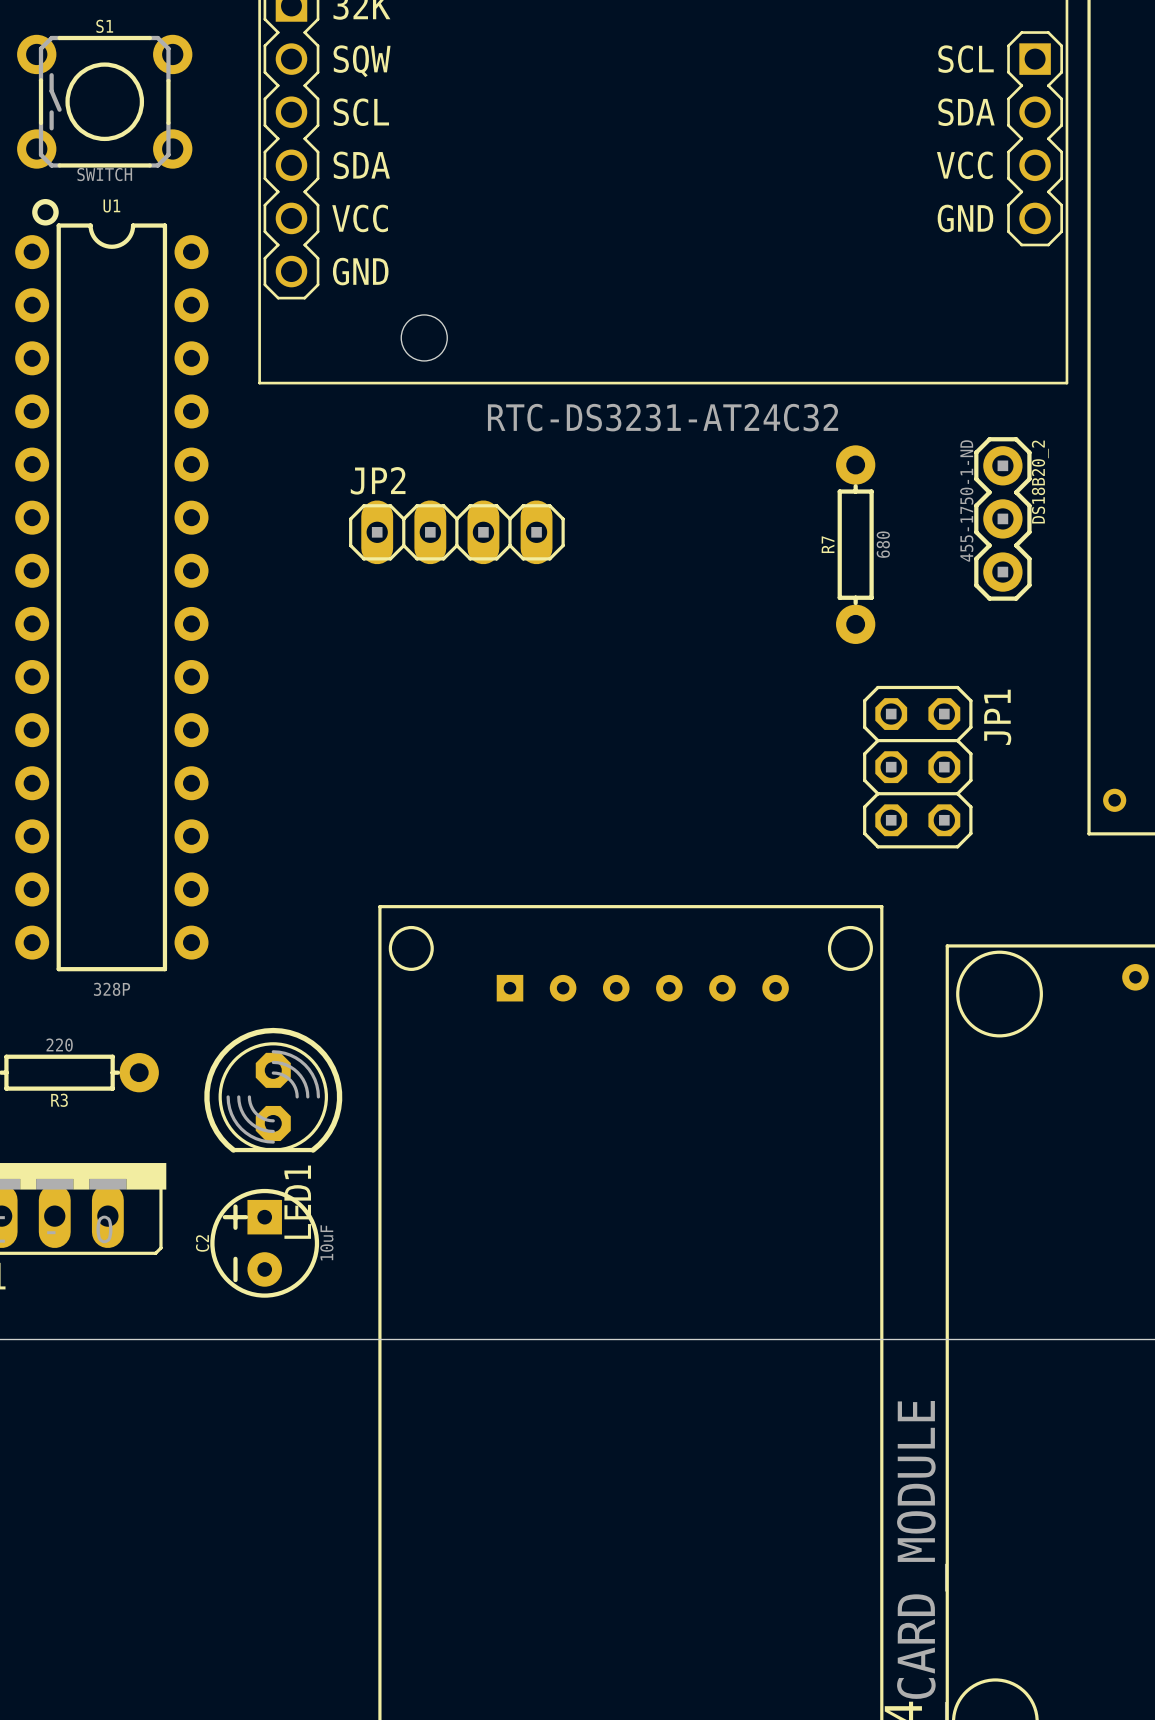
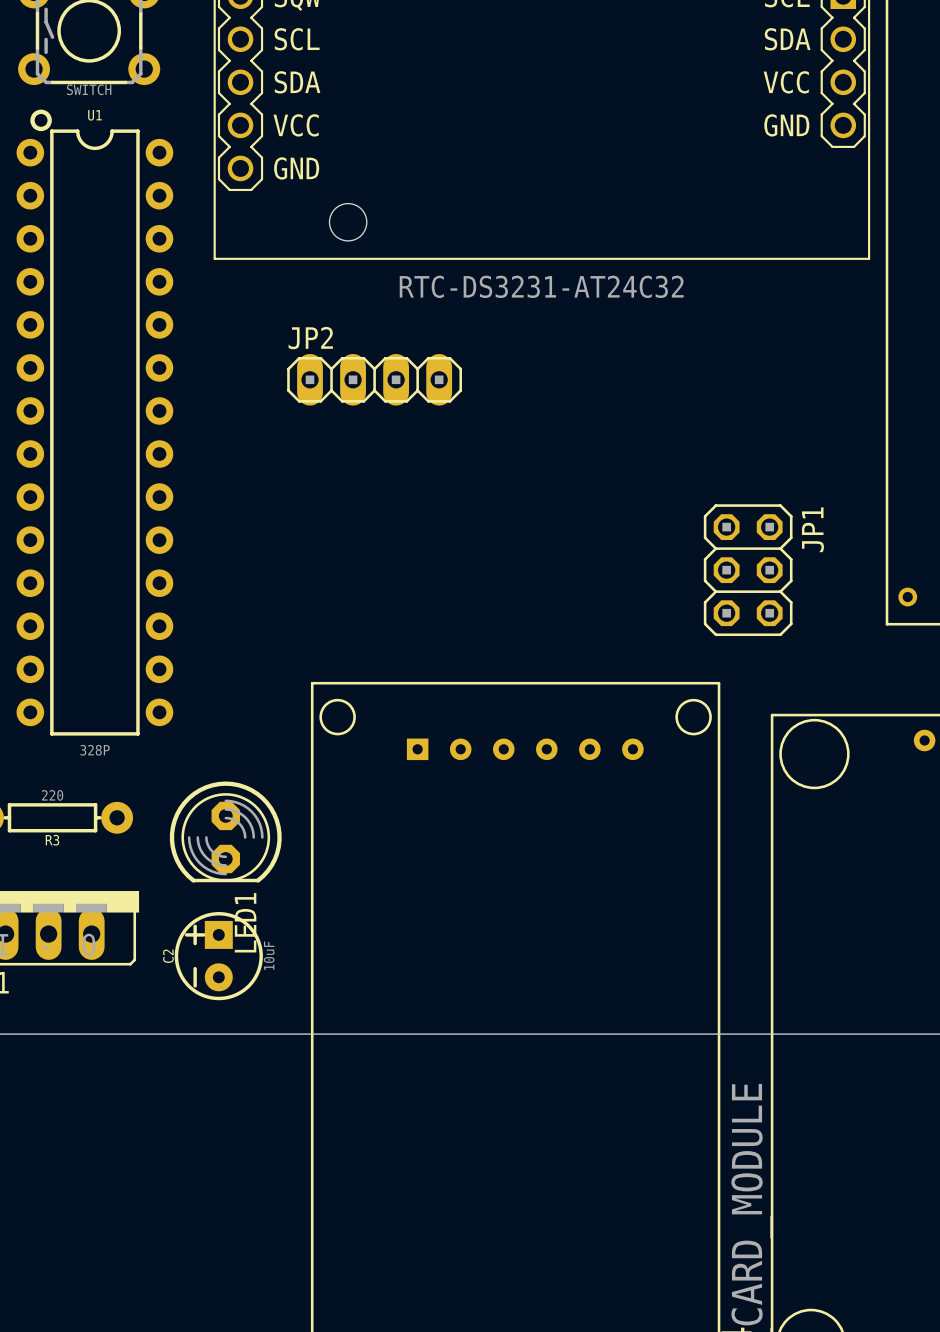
DS18B20_2: 455-1750-1-ND (1002, 518) -> none
R7: 680 (855, 544) -> none

